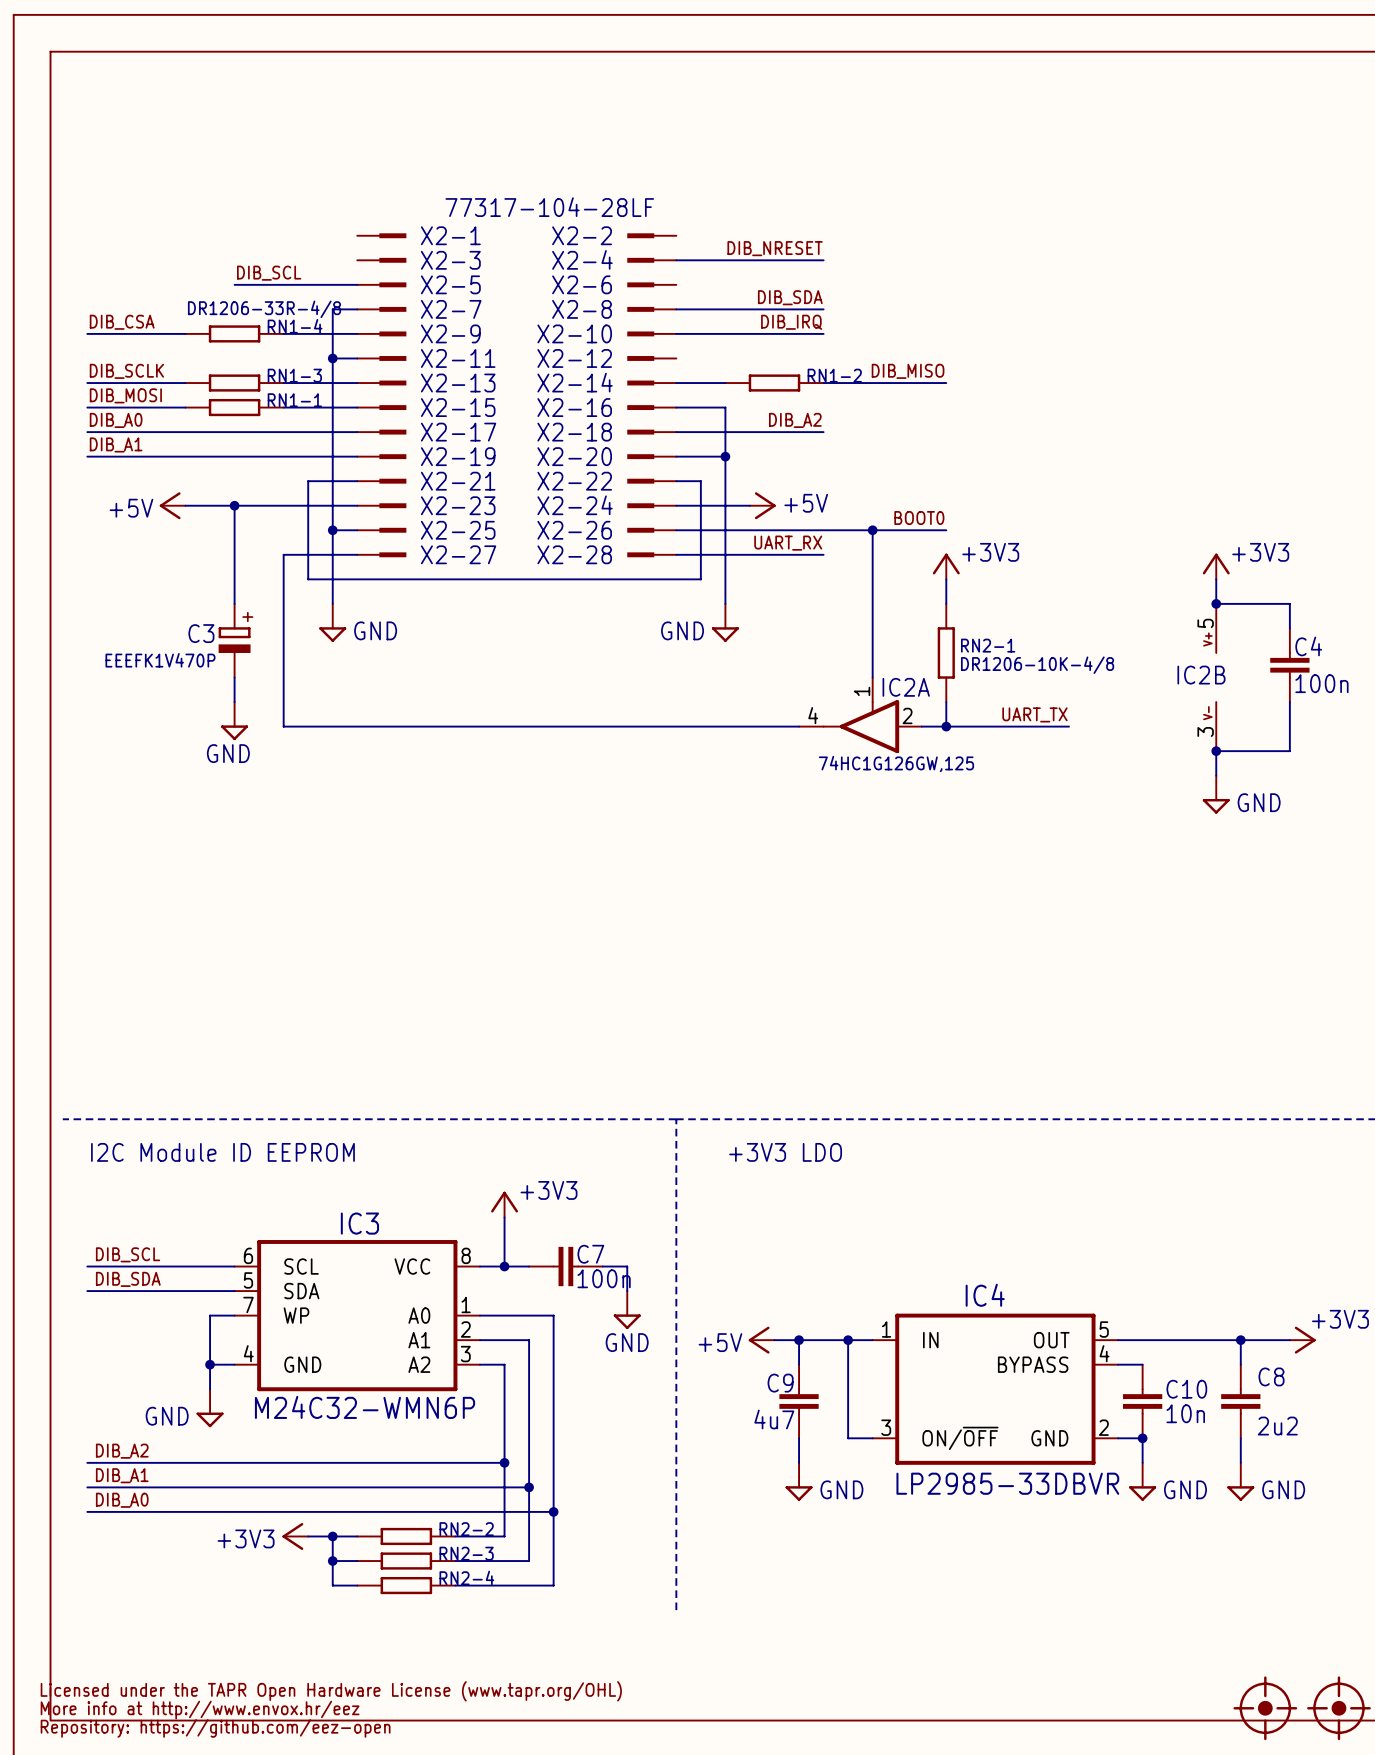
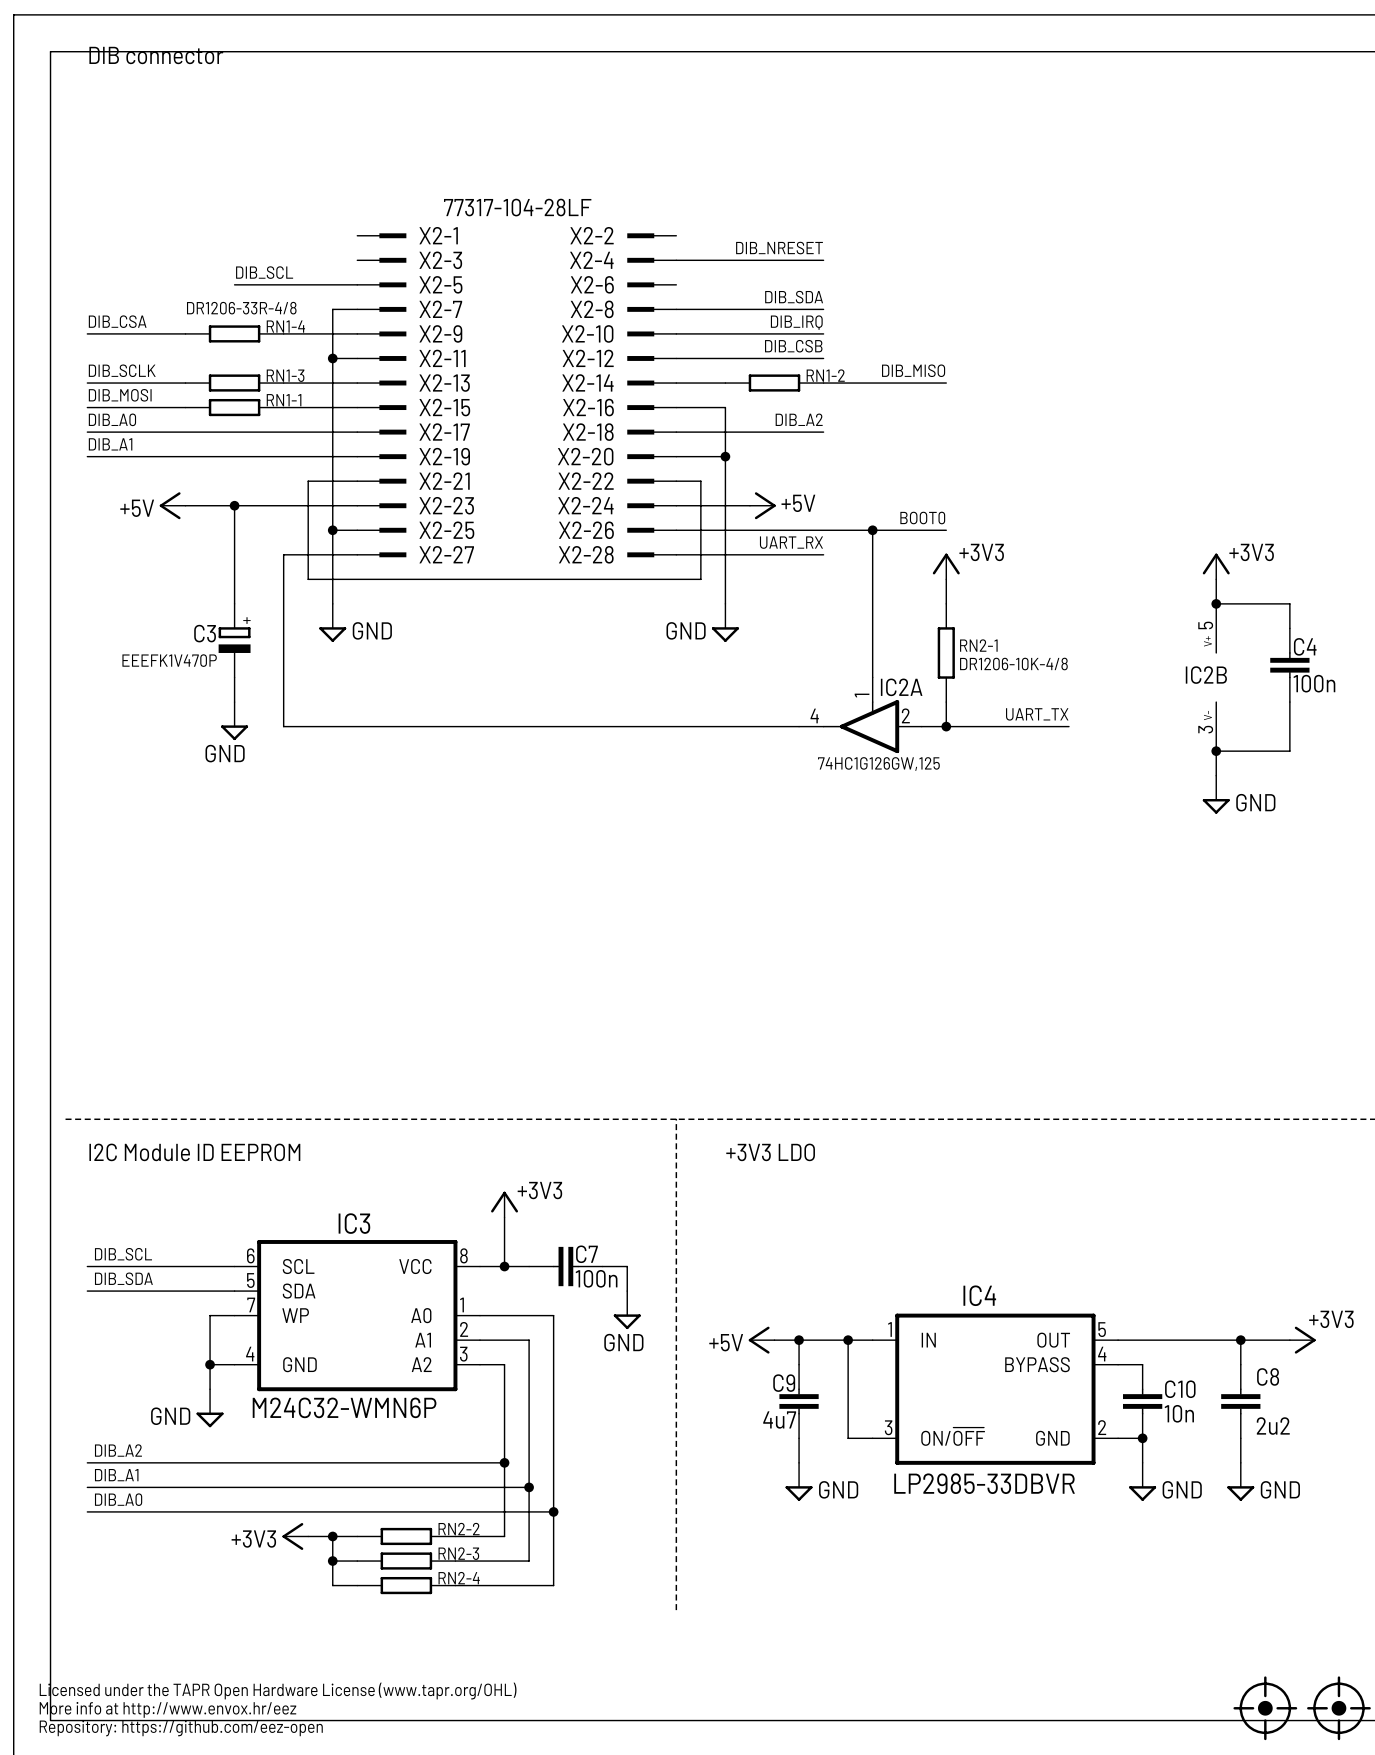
text: none -> DIB connector (156, 55)
label: none -> DIB_CSB (793, 346)
wire: none -> (676, 358) (823, 358)

